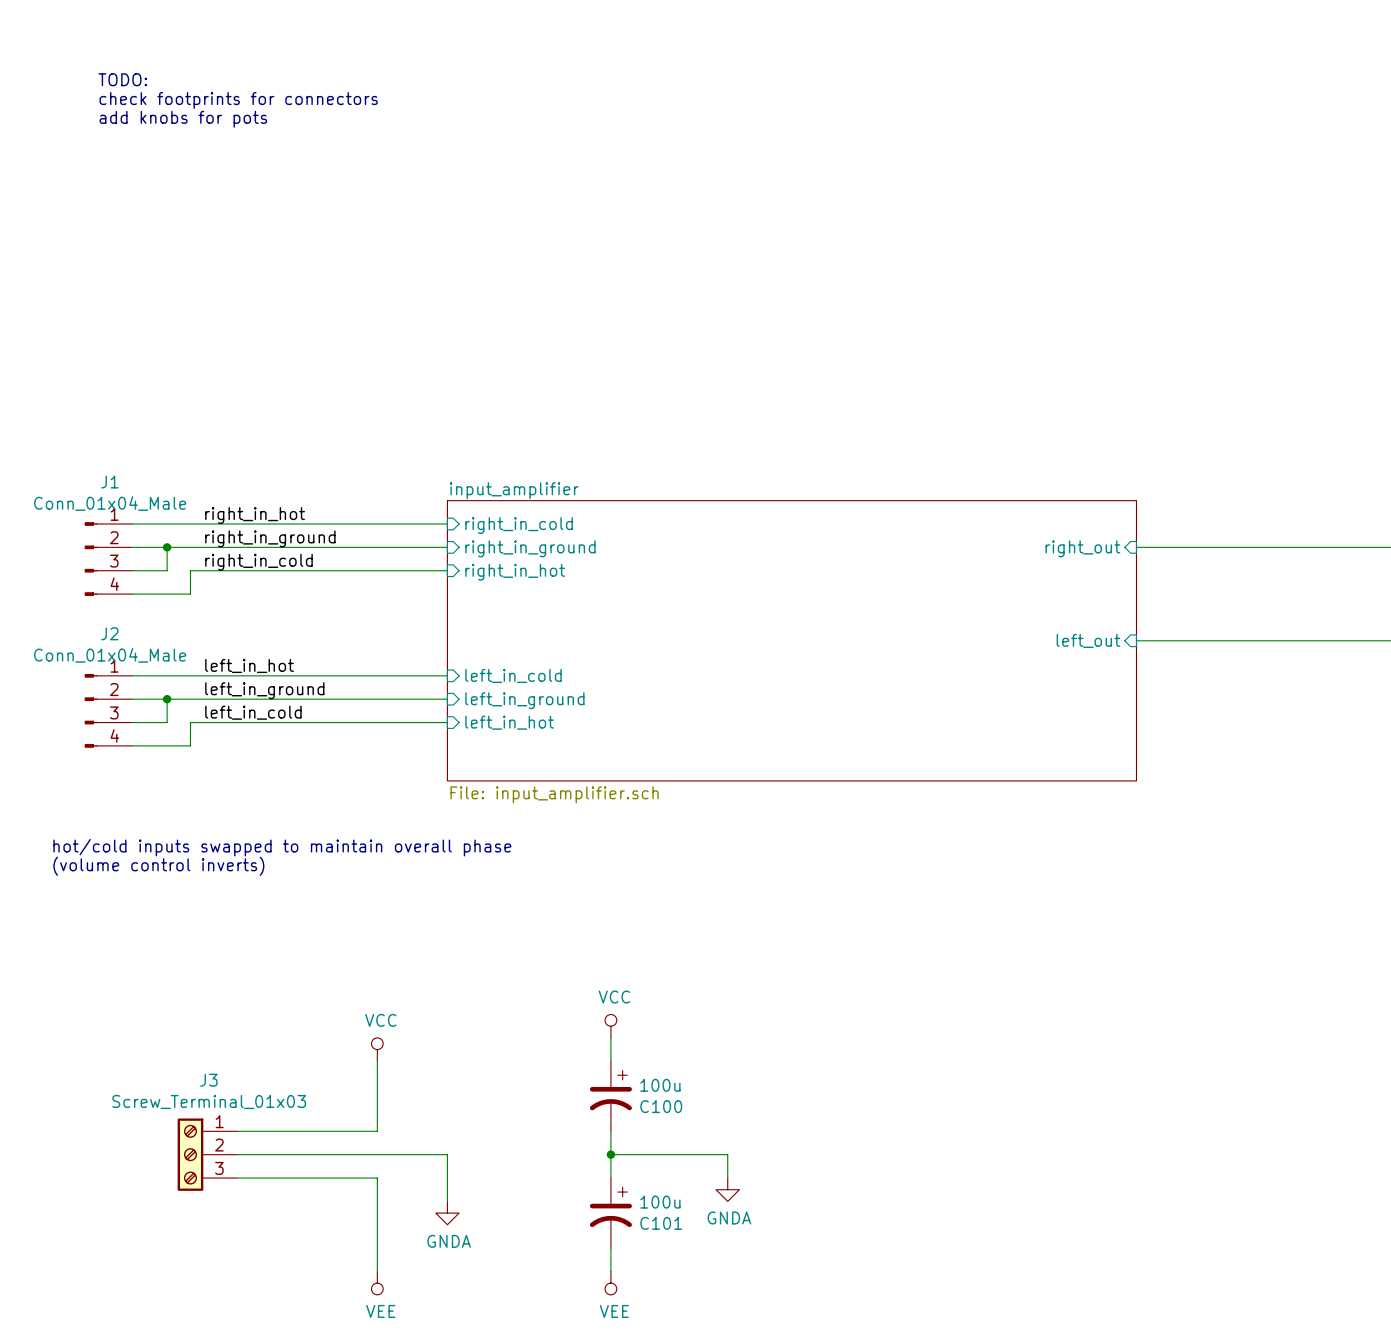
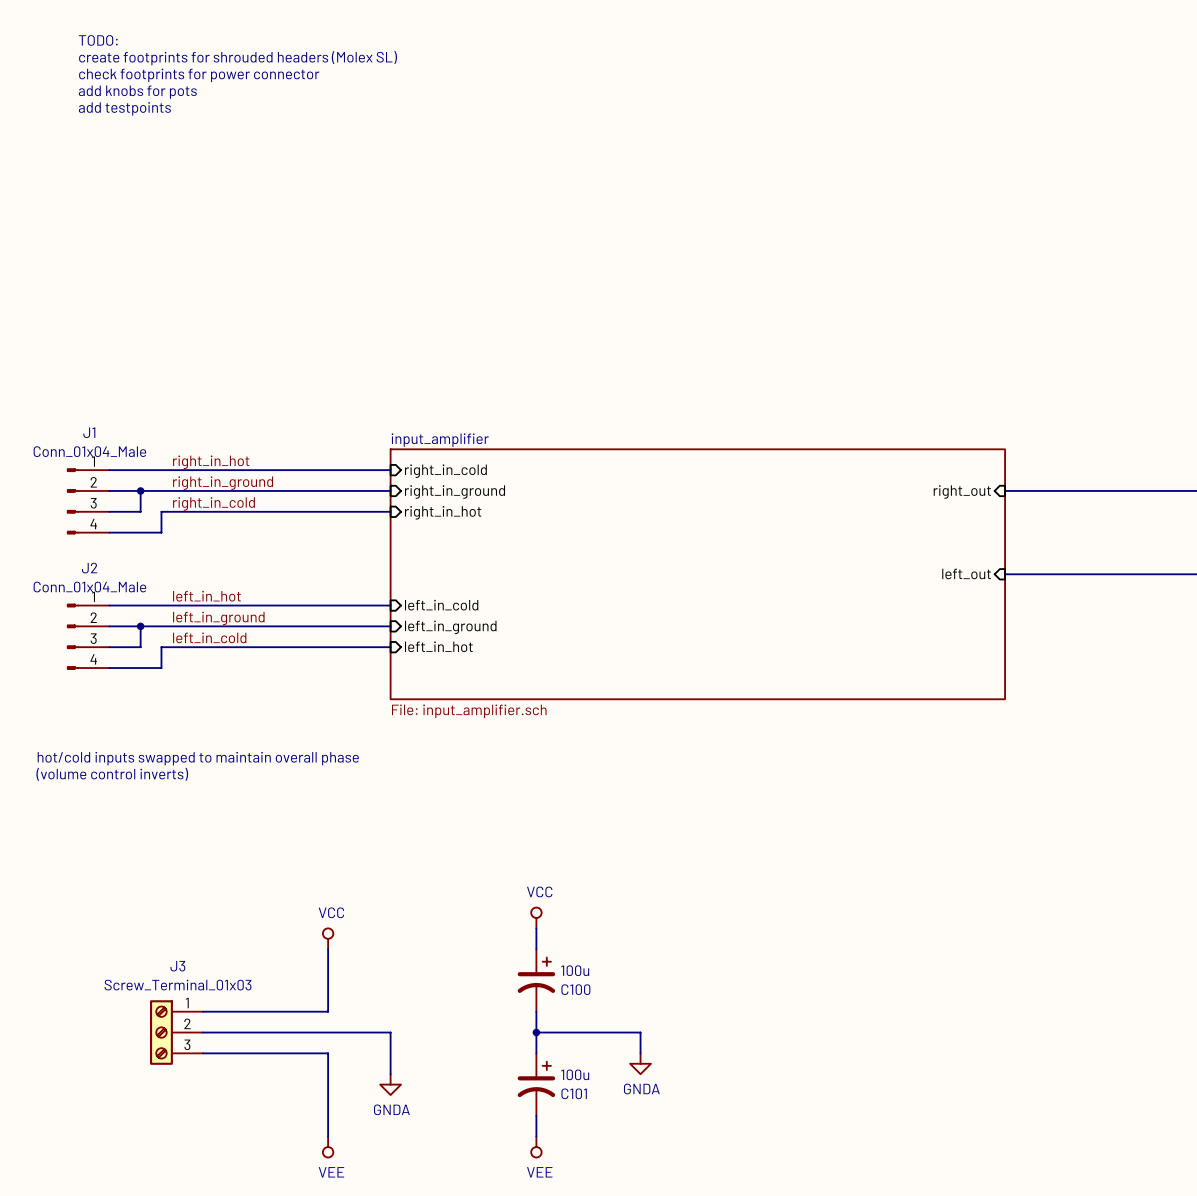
text: none -> TODO: (98, 40)
text: none -> create footprints for shrouded headers (Molex SL) (238, 58)
text: TODO: (122, 79) -> check footprints for power connector (199, 75)
text: check footprints for connectors (238, 100) -> add knobs for pots (137, 92)
text: add knobs for pots (183, 119) -> add testpoints (124, 108)

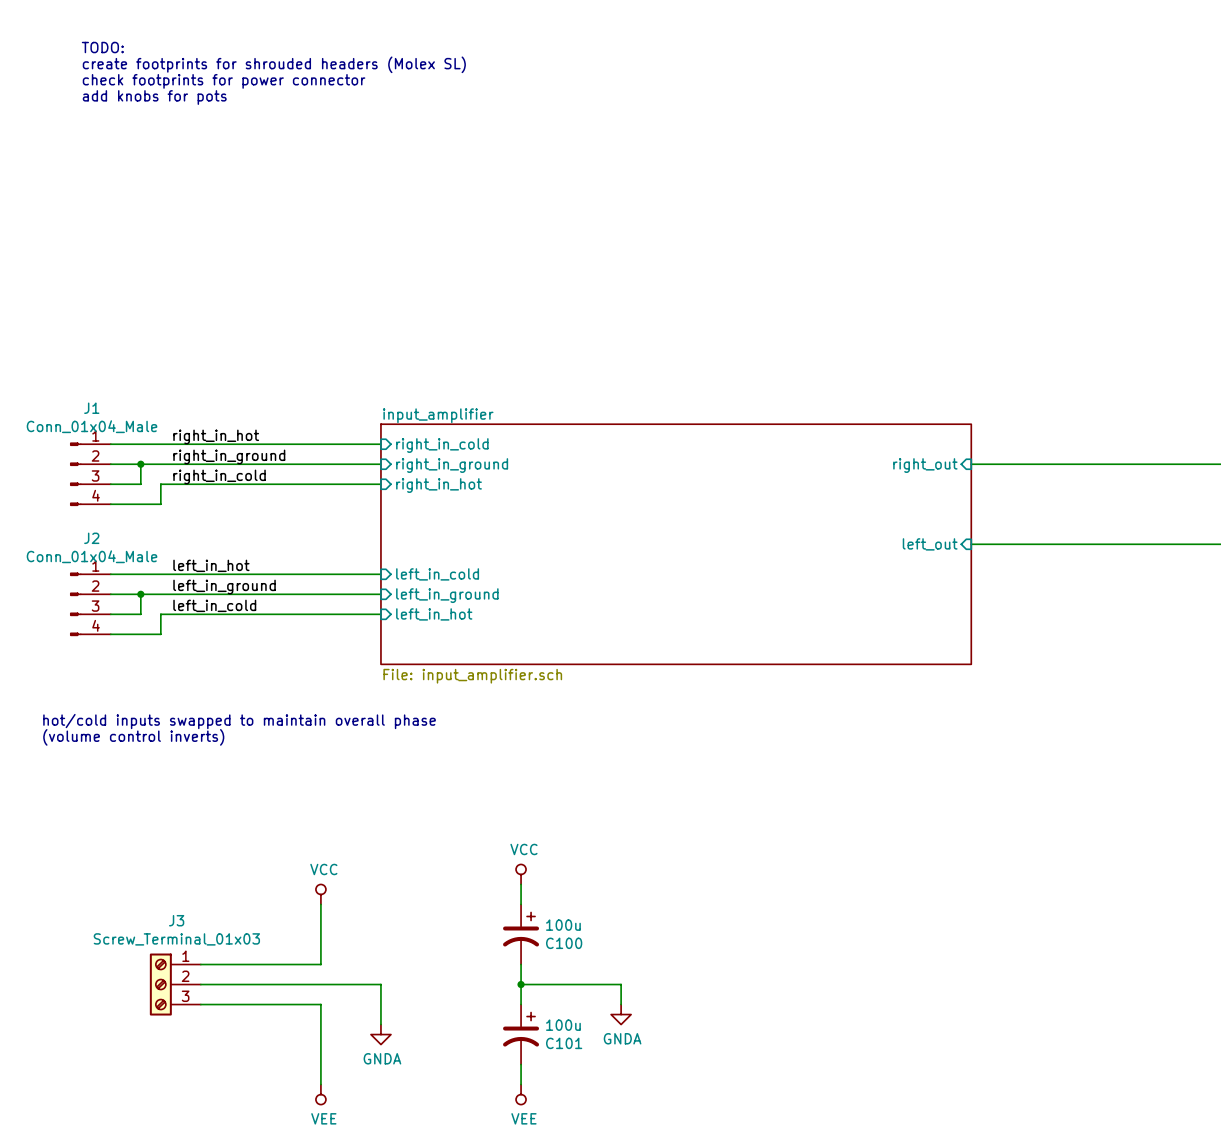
text: TODO: (98, 40) -> none
text: create footprints for shrouded headers (Molex SL) (238, 58) -> TODO: (102, 47)
text: check footprints for power connector (199, 75) -> create footprints for shrouded headers (Molex SL) (274, 64)
text: add knobs for pots (137, 92) -> check footprints for power connector (224, 81)
text: add testpoints (124, 108) -> add knobs for pots (154, 97)

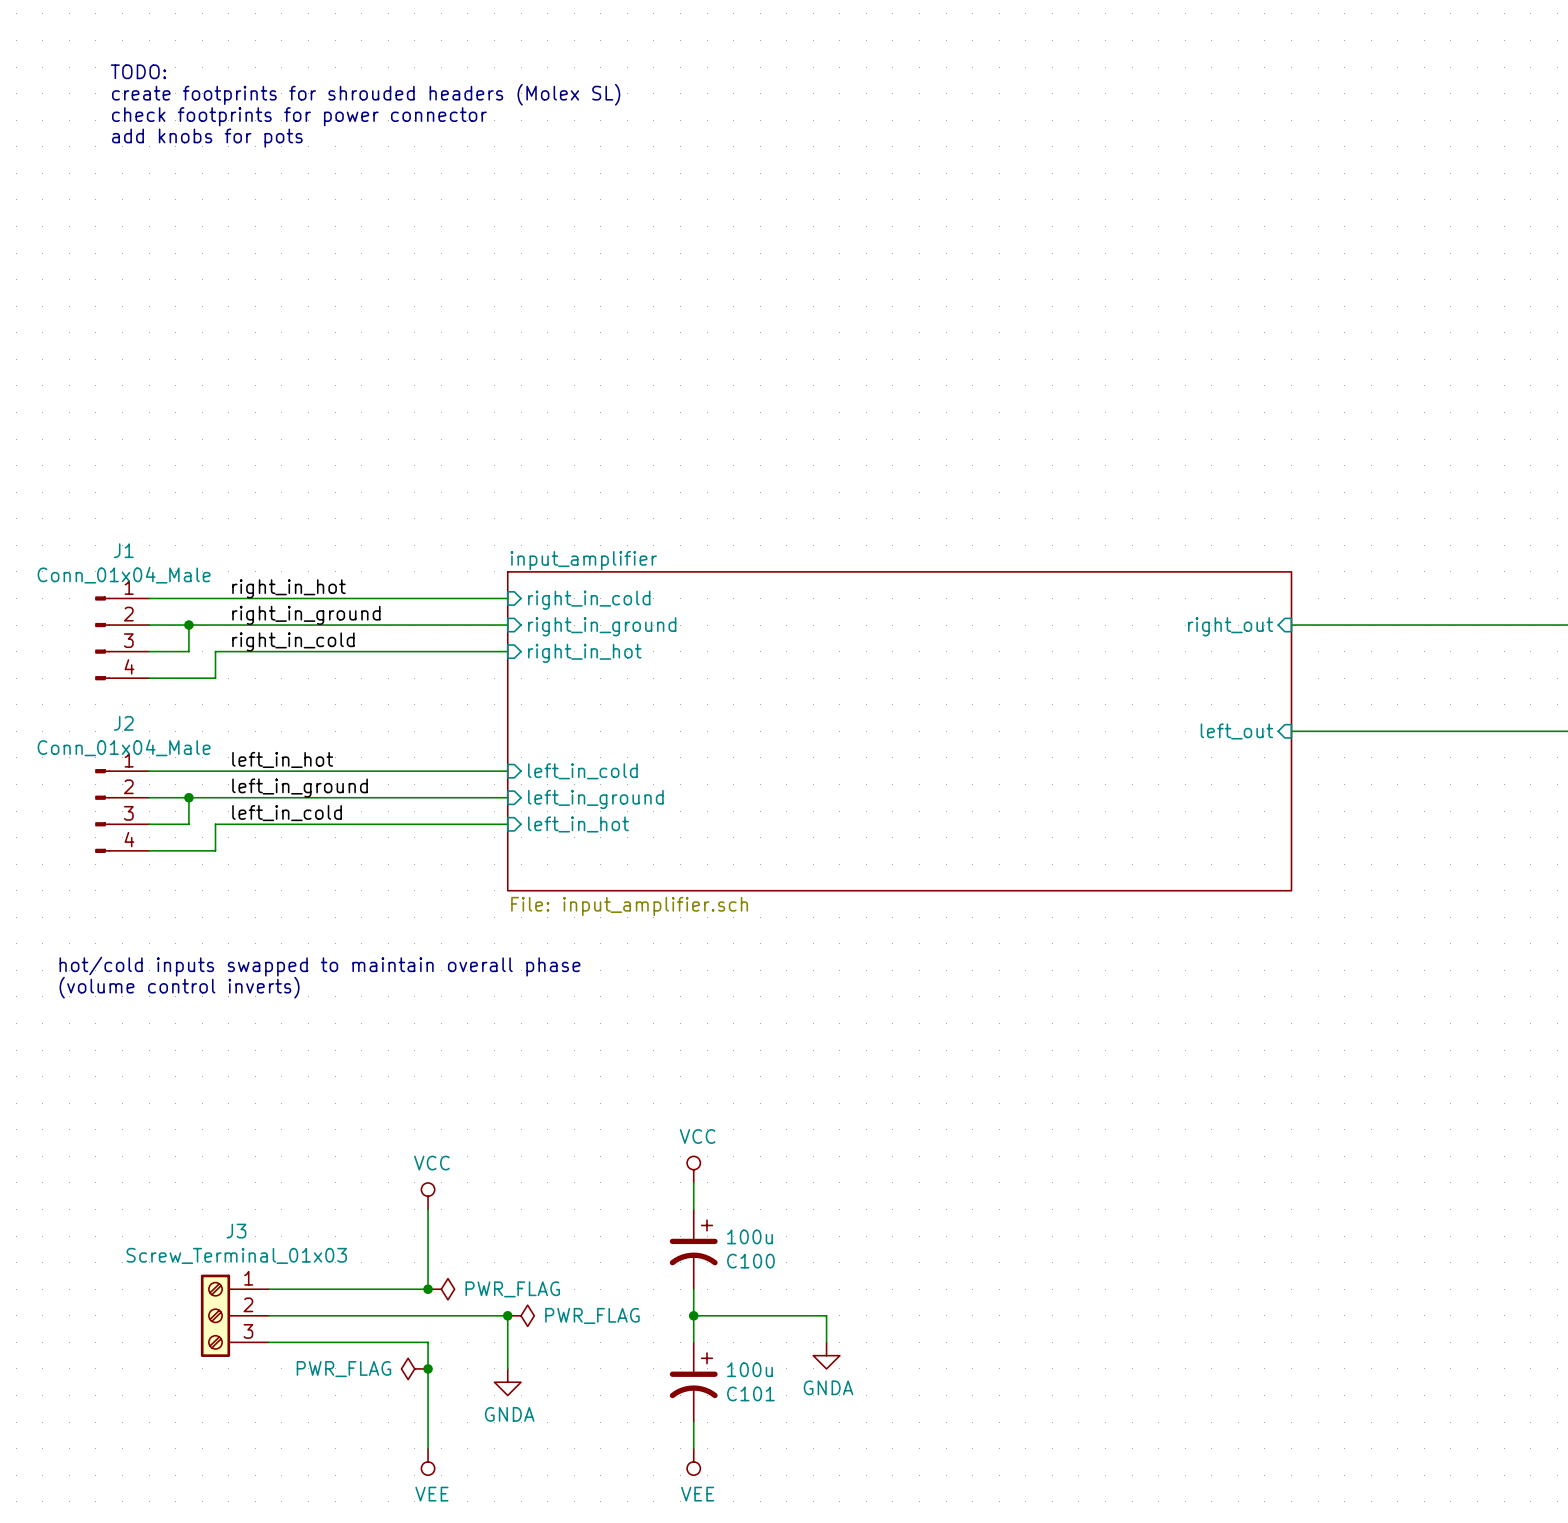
junction: none -> (428, 1289)
power symbol: none -> PWR_FLAG (441, 1289)
junction: none -> (507, 1315)
power symbol: none -> PWR_FLAG (521, 1315)
power symbol: none -> PWR_FLAG (414, 1368)
junction: none -> (428, 1368)

